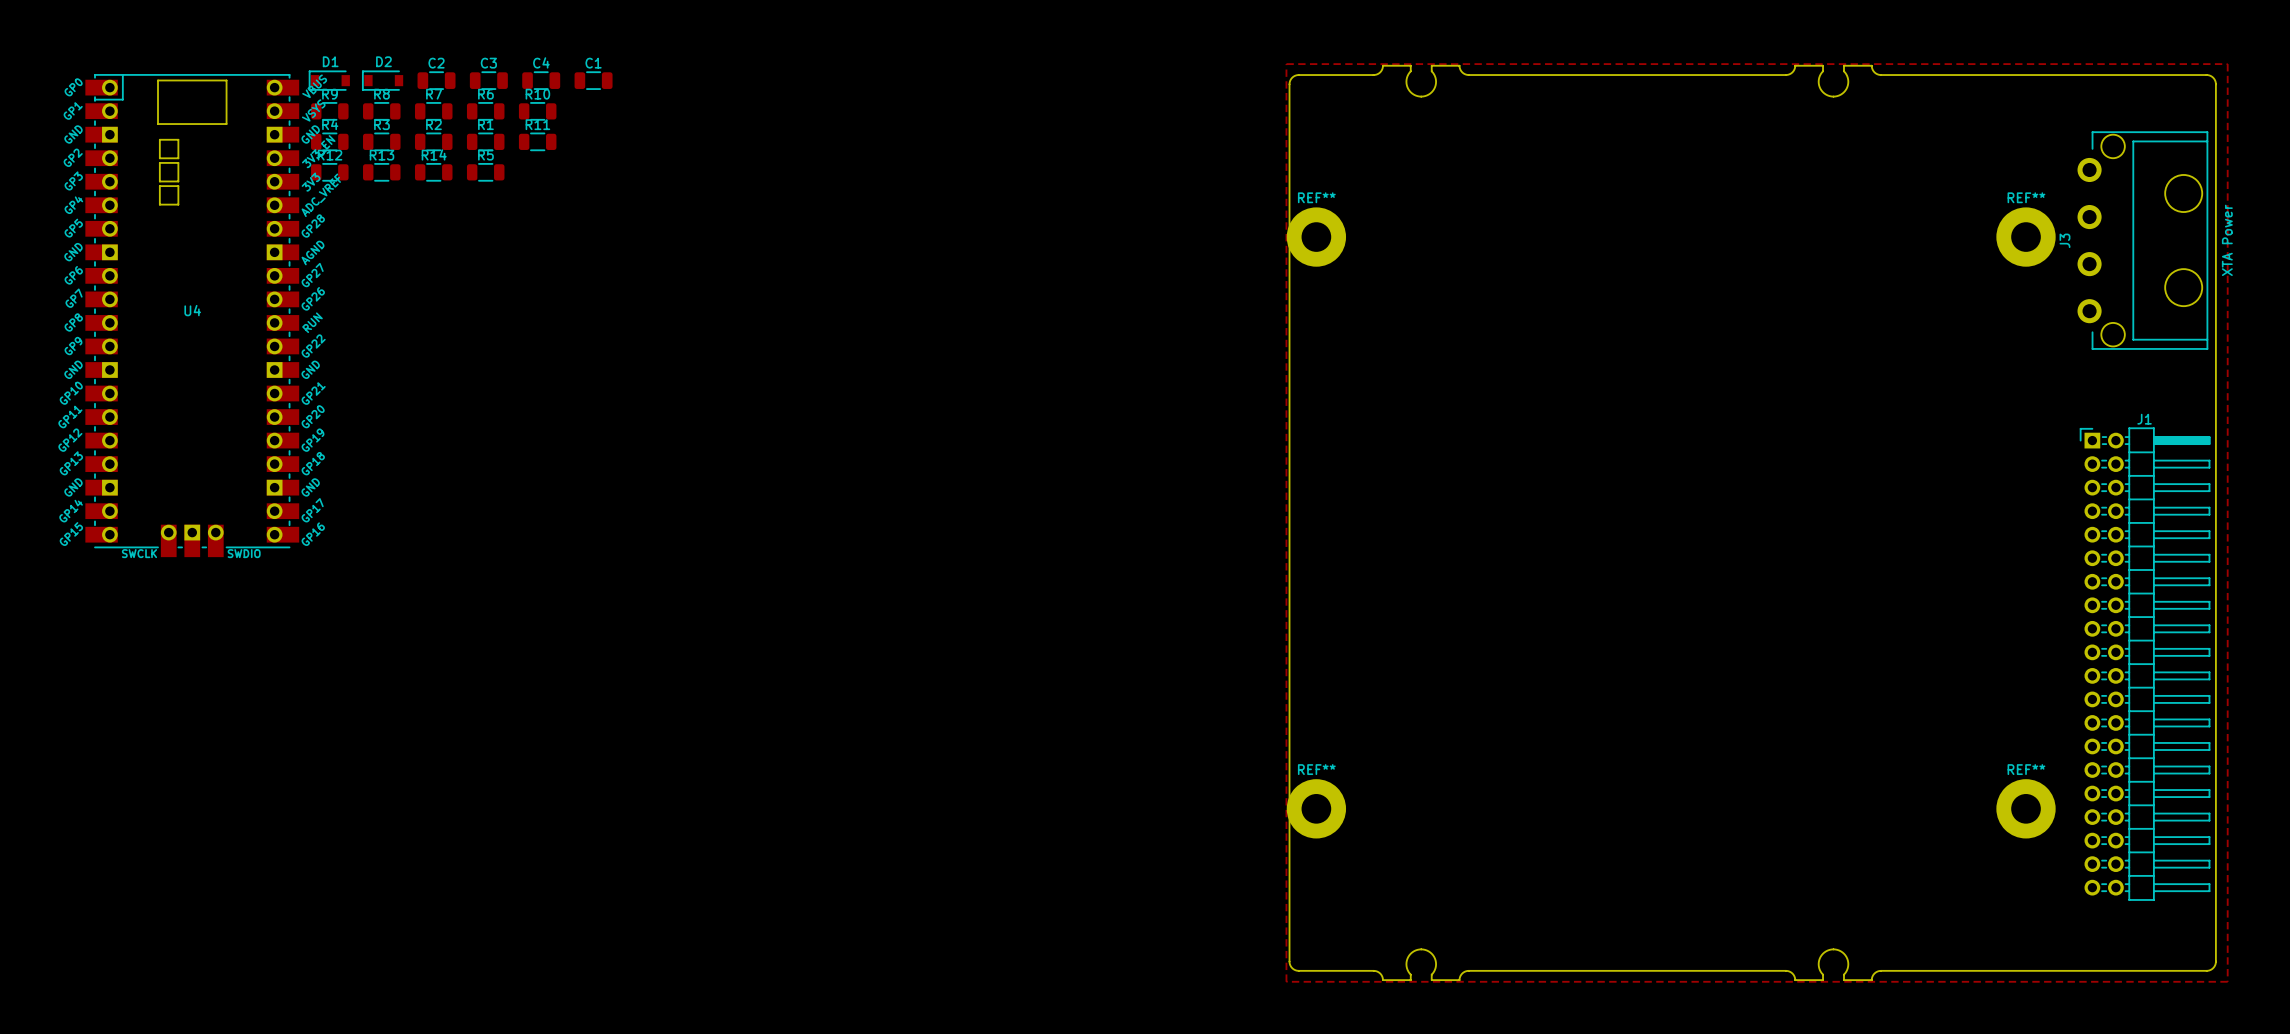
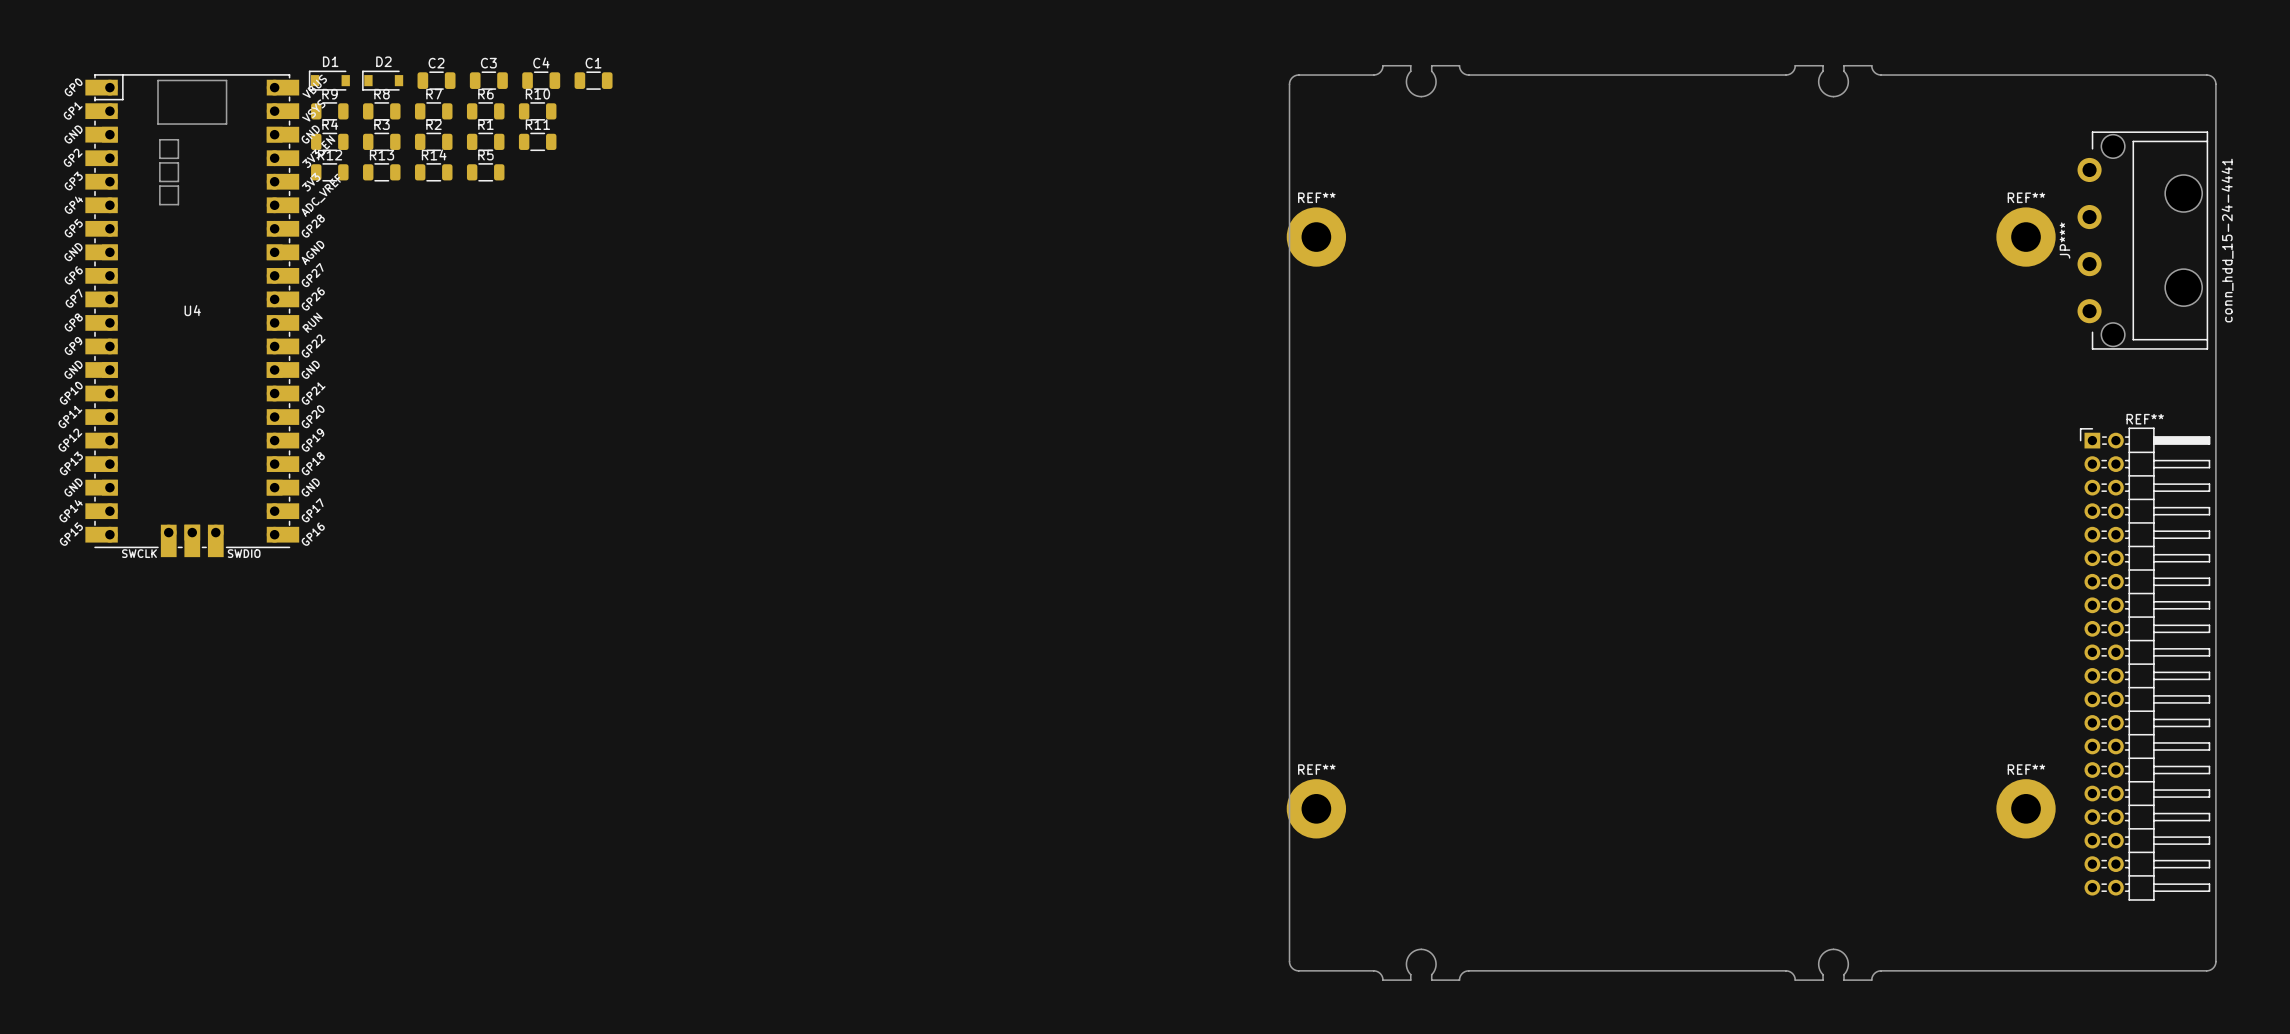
zone outline: (1286, 64) (1286, 981) (2227, 981) (2227, 64) (1286, 64) -> none
XTA Power value: J3 (2064, 240) -> JP*** (2064, 240)
XTA Power name: XTA Power (2227, 240) -> conn_hdd_15-24-4441 (2227, 240)
J1 name: J1 (2144, 419) -> REF** (2145, 419)

